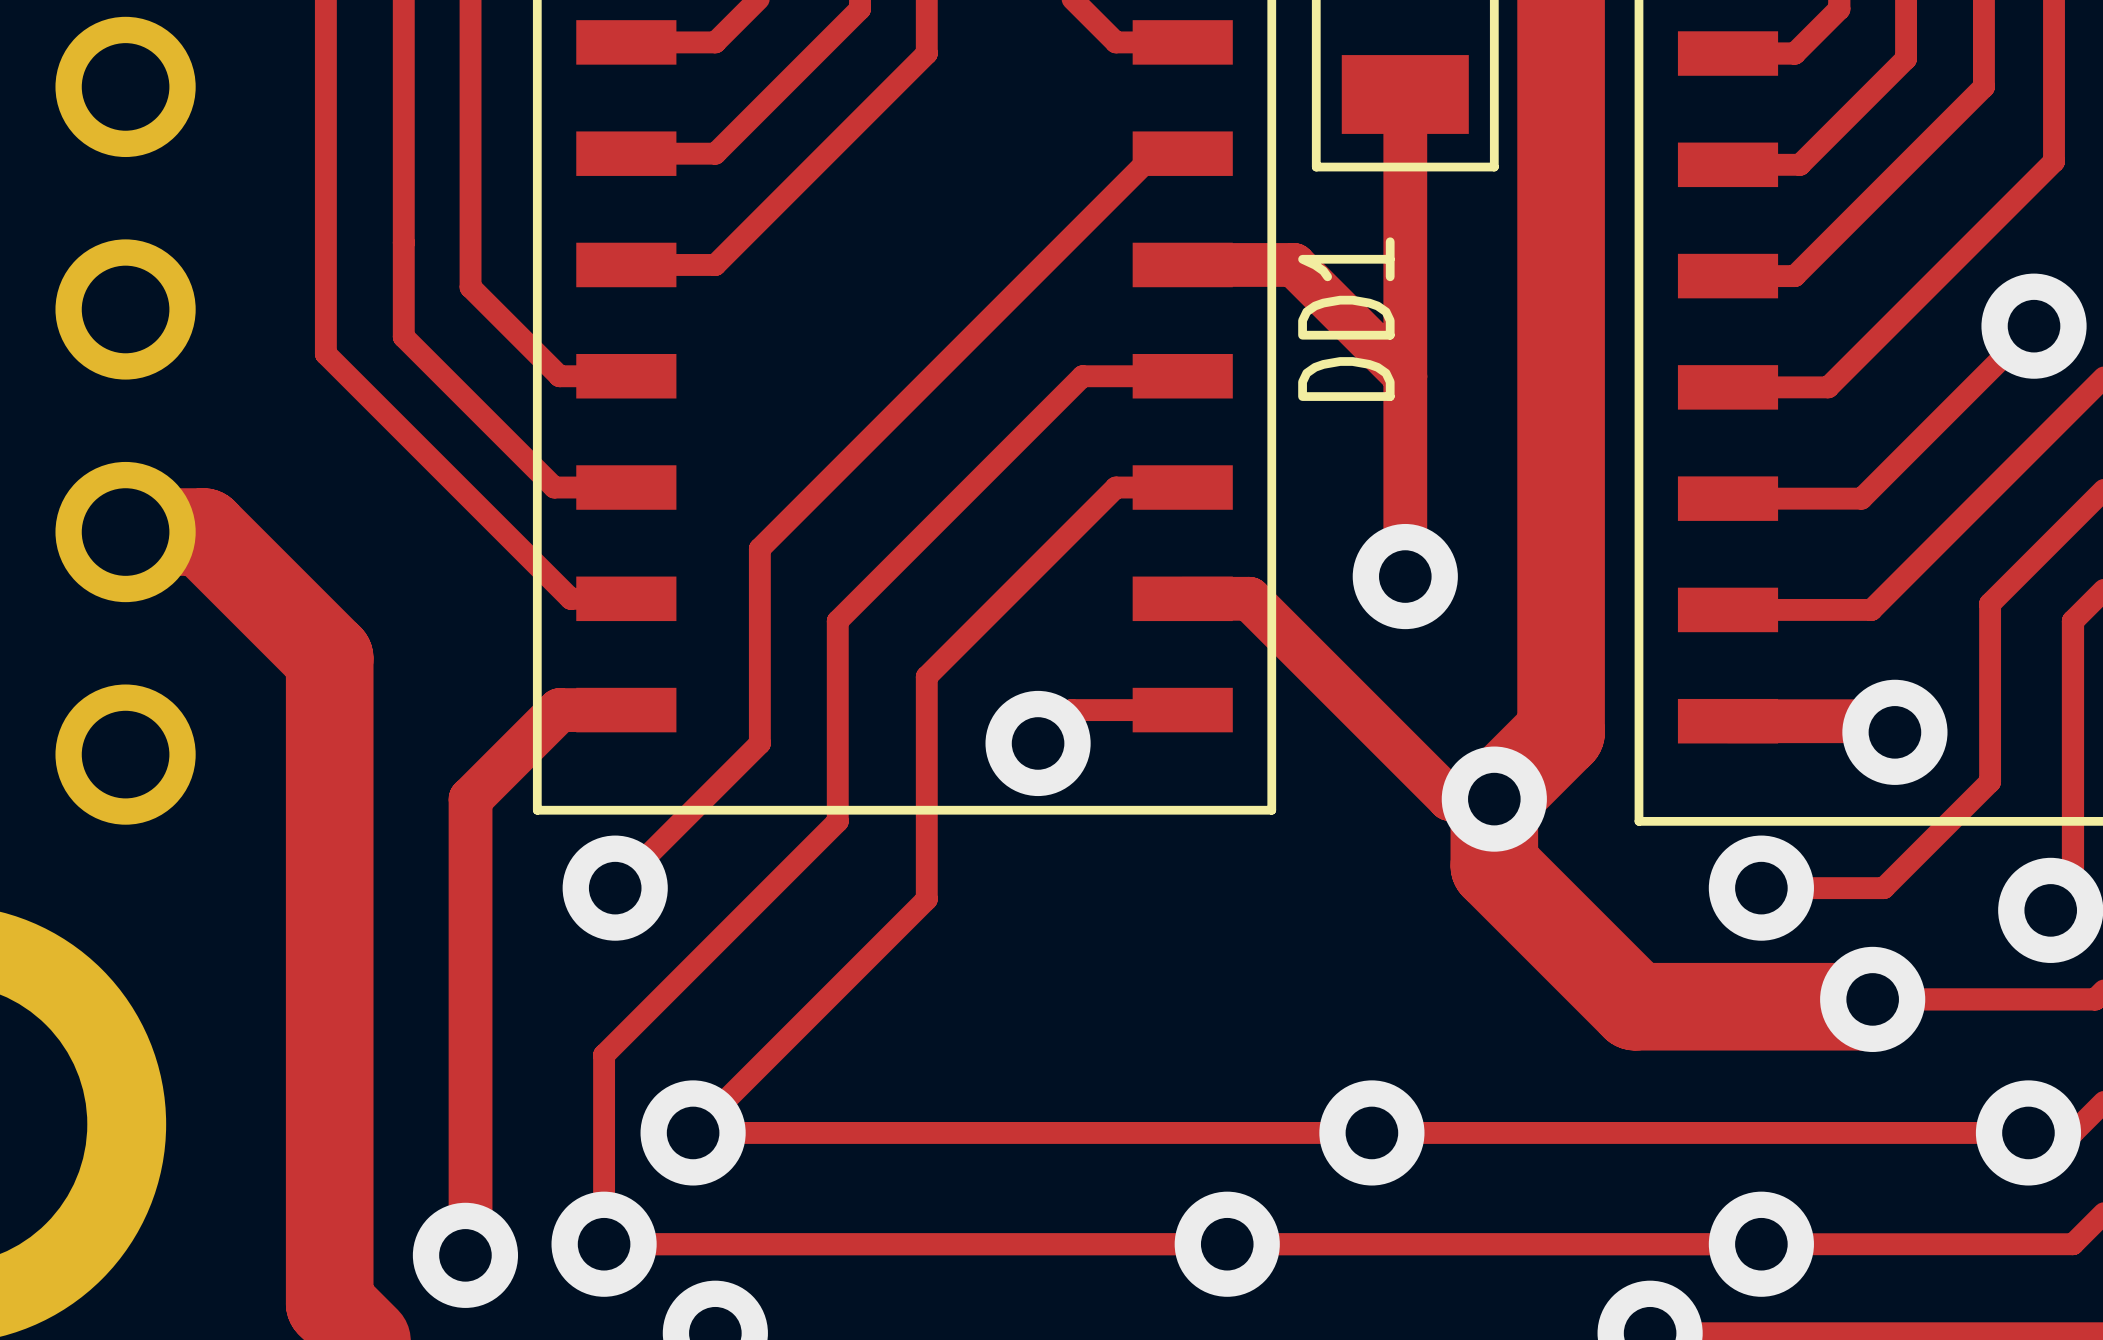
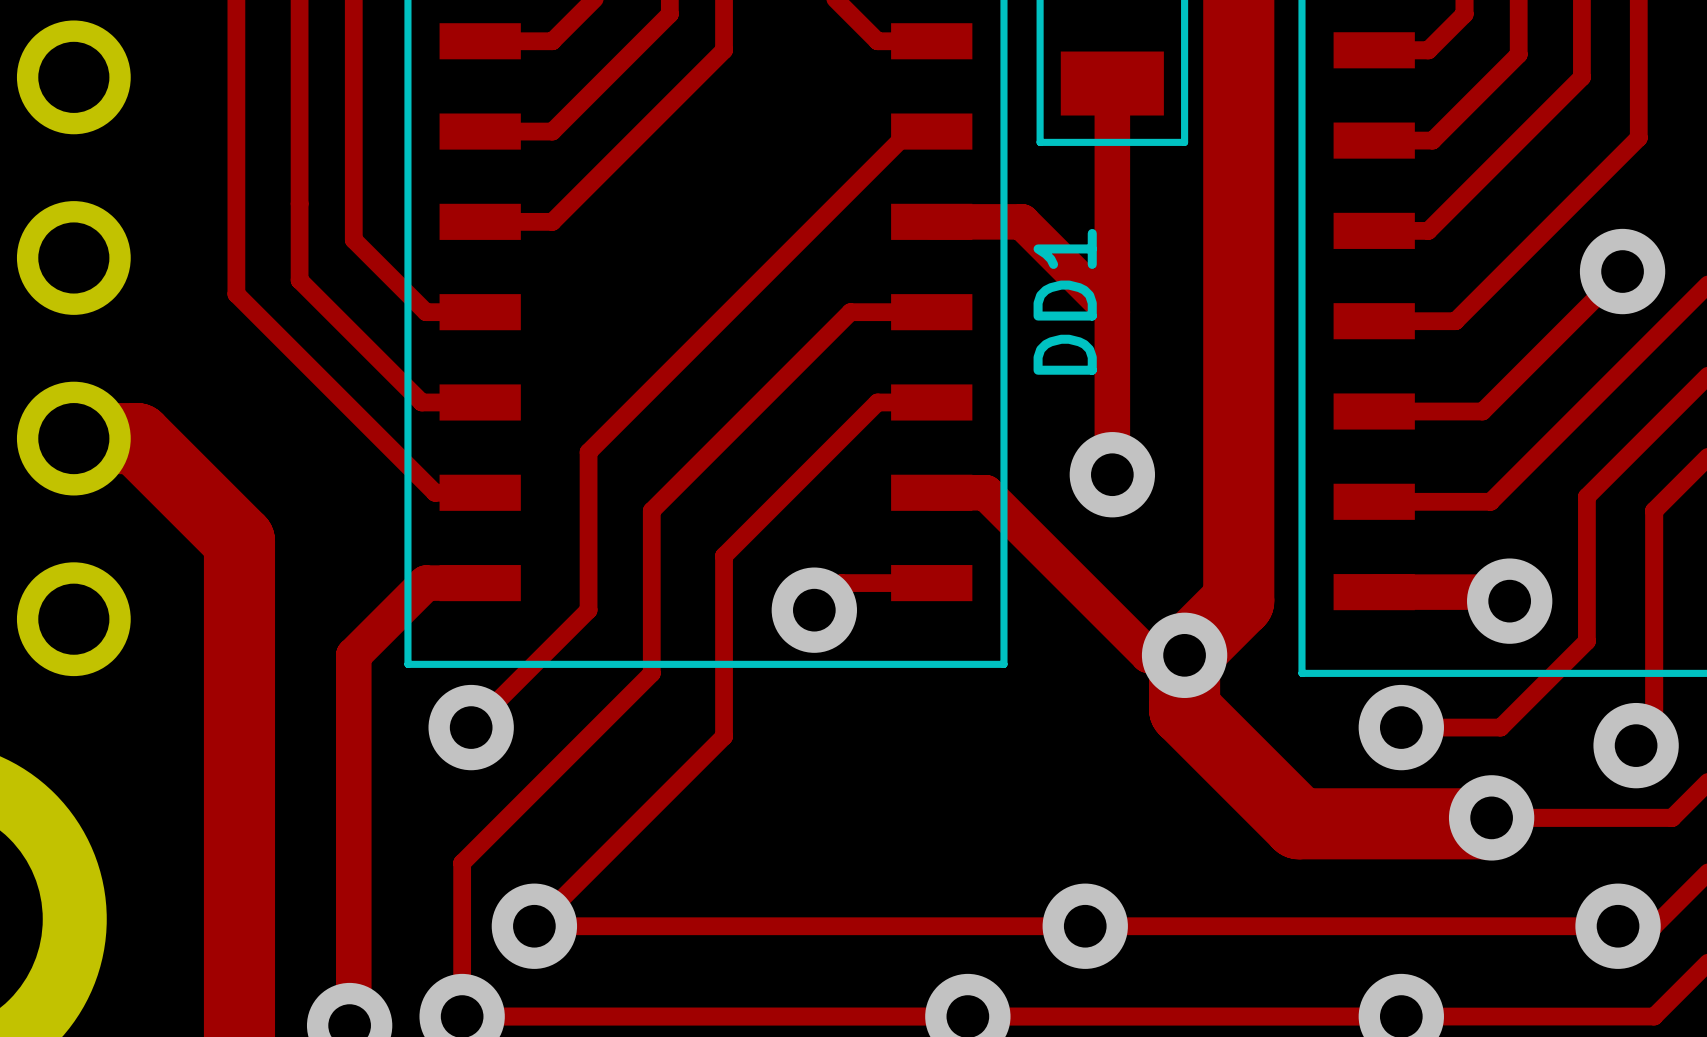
DD1 name position: DD1 (1346, 319) -> DD1 (1065, 301)

